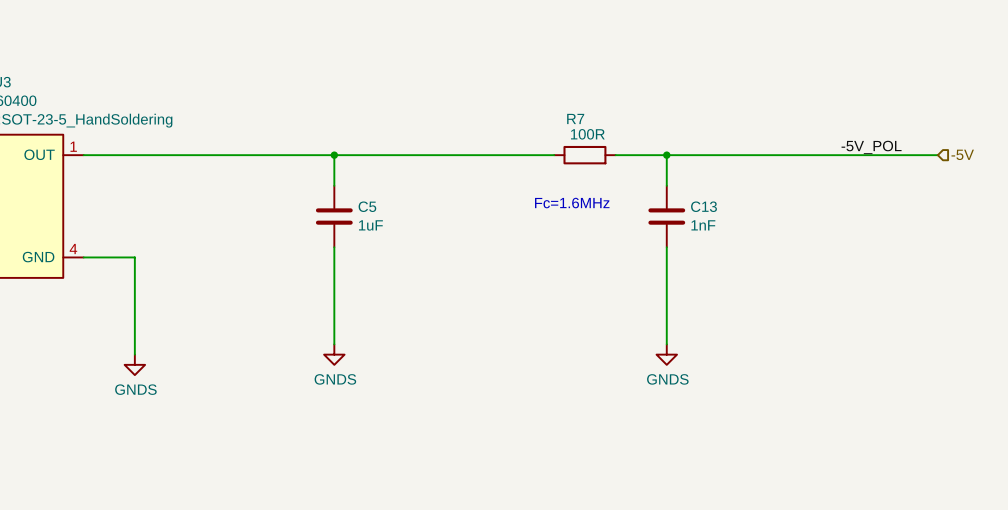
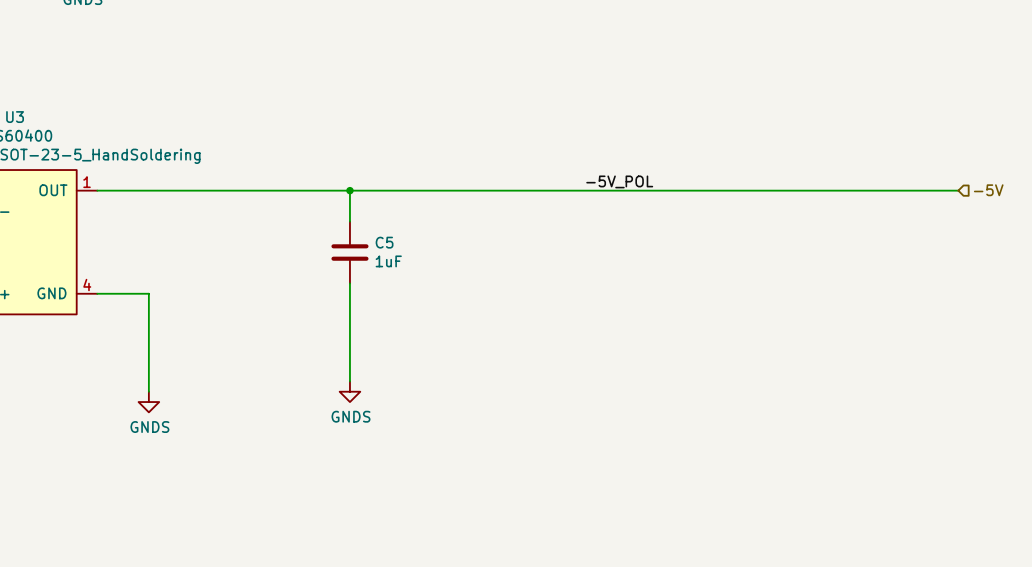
label: none -> -5V_POL (619, 181)
label: -5V_POL (871, 147) -> none
wire: none -> (571, 190) (633, 190)
R7: 100R (584, 155) -> none
wire: (666, 155) (666, 185) -> none
junction: (666, 155) -> none
text: Fc=1.6MHz (572, 203) -> none
C13: 1nF (666, 216) -> none
wire: (666, 247) (666, 344) -> none
power symbol: GNDS (666, 354) -> none

